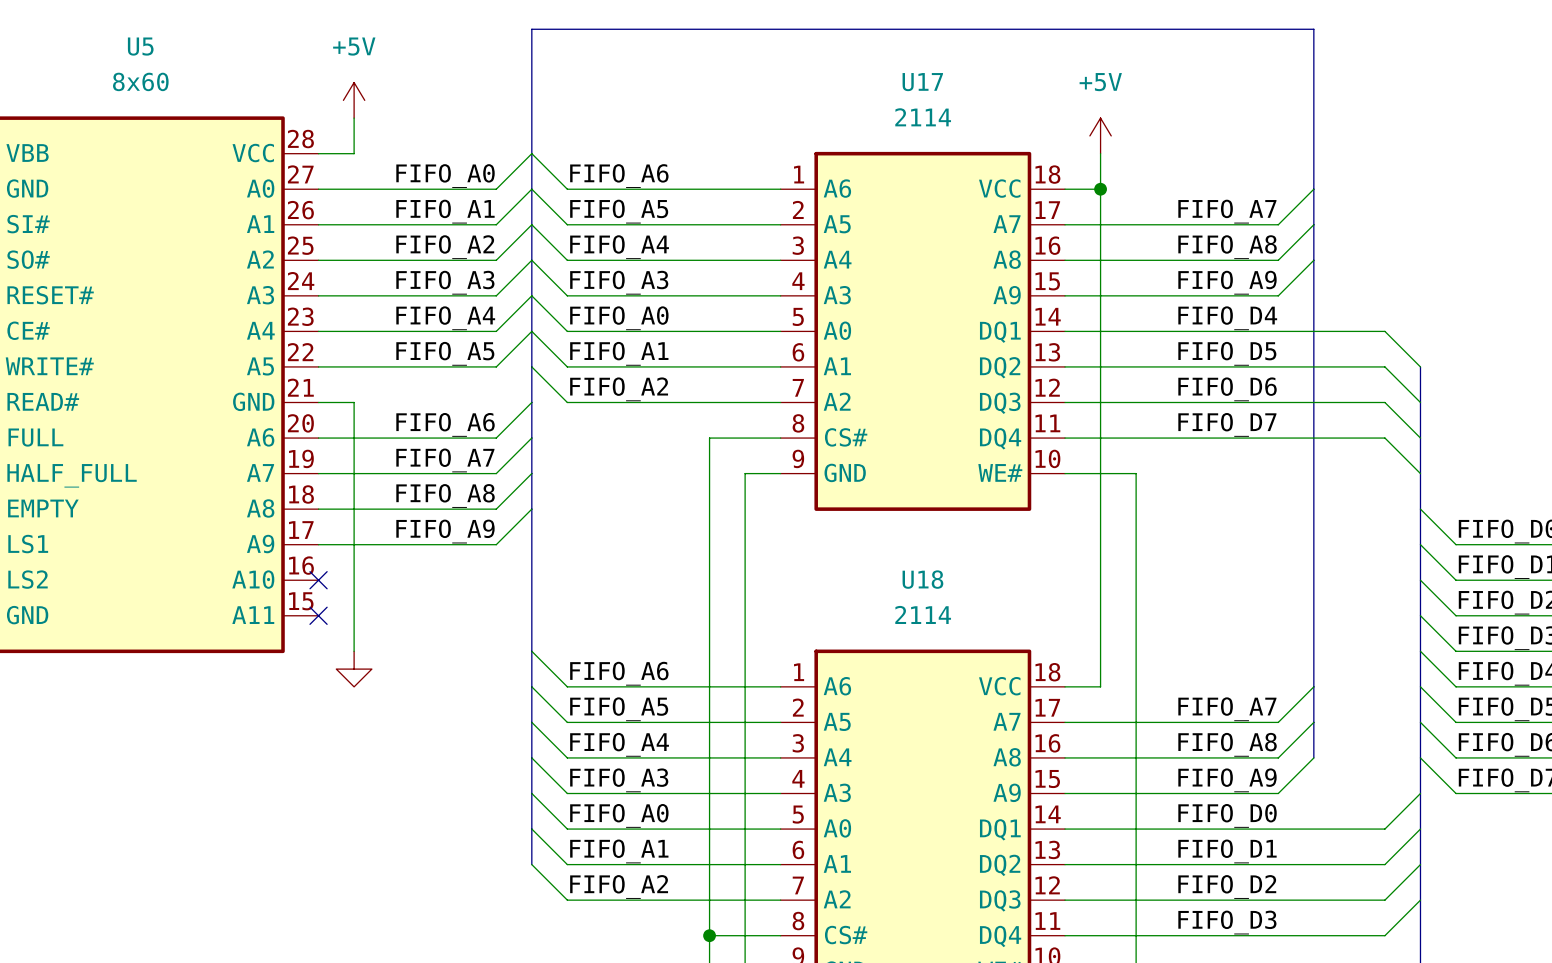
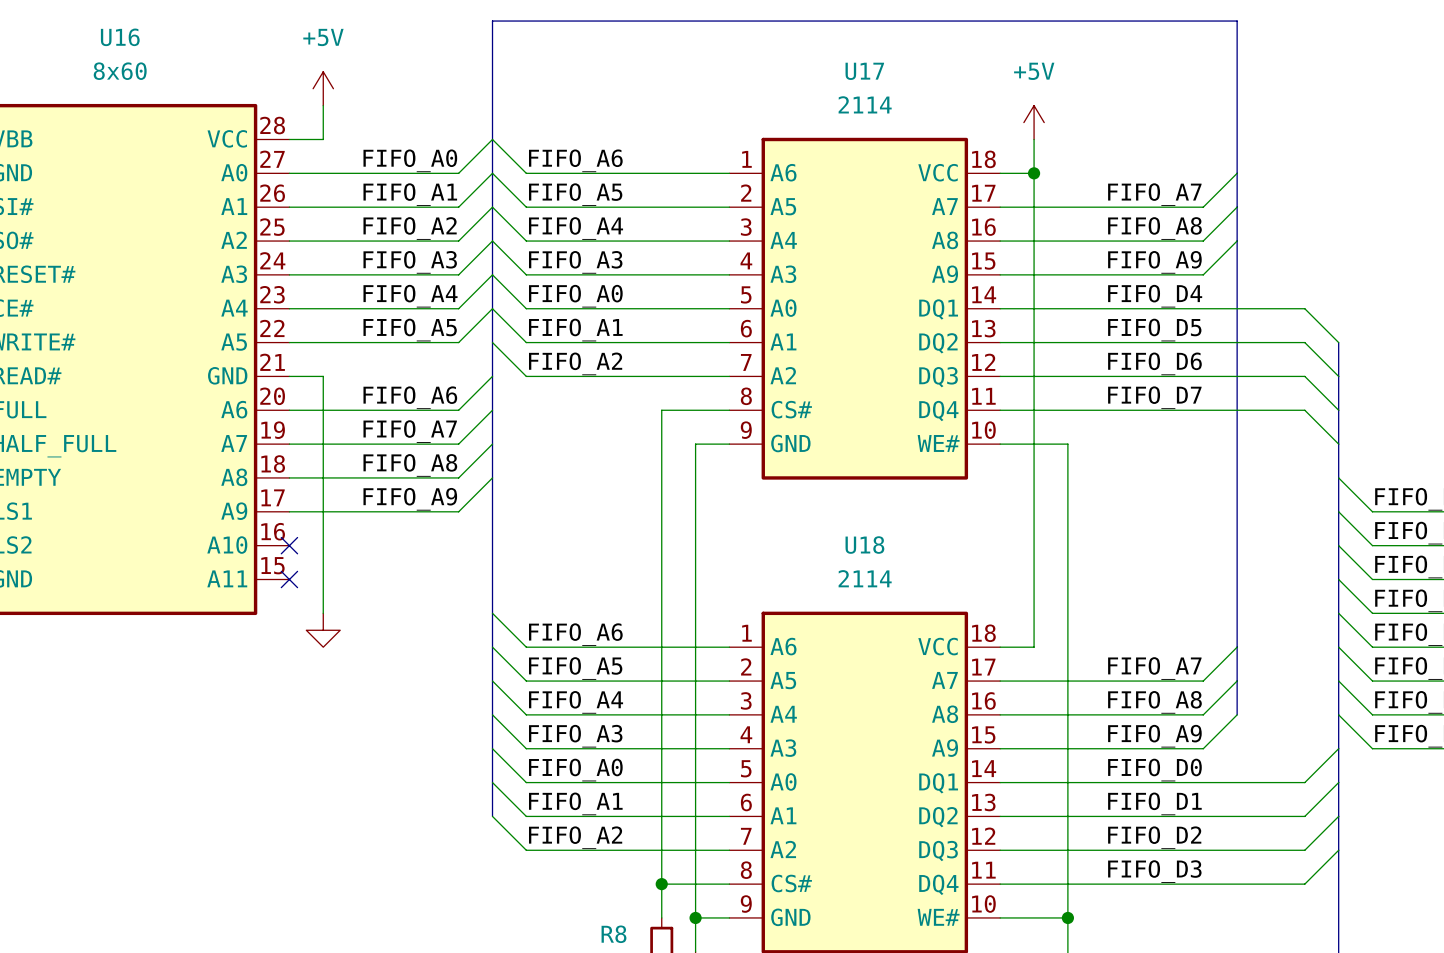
U5 name: U5 (140, 46) -> U16 (120, 37)

